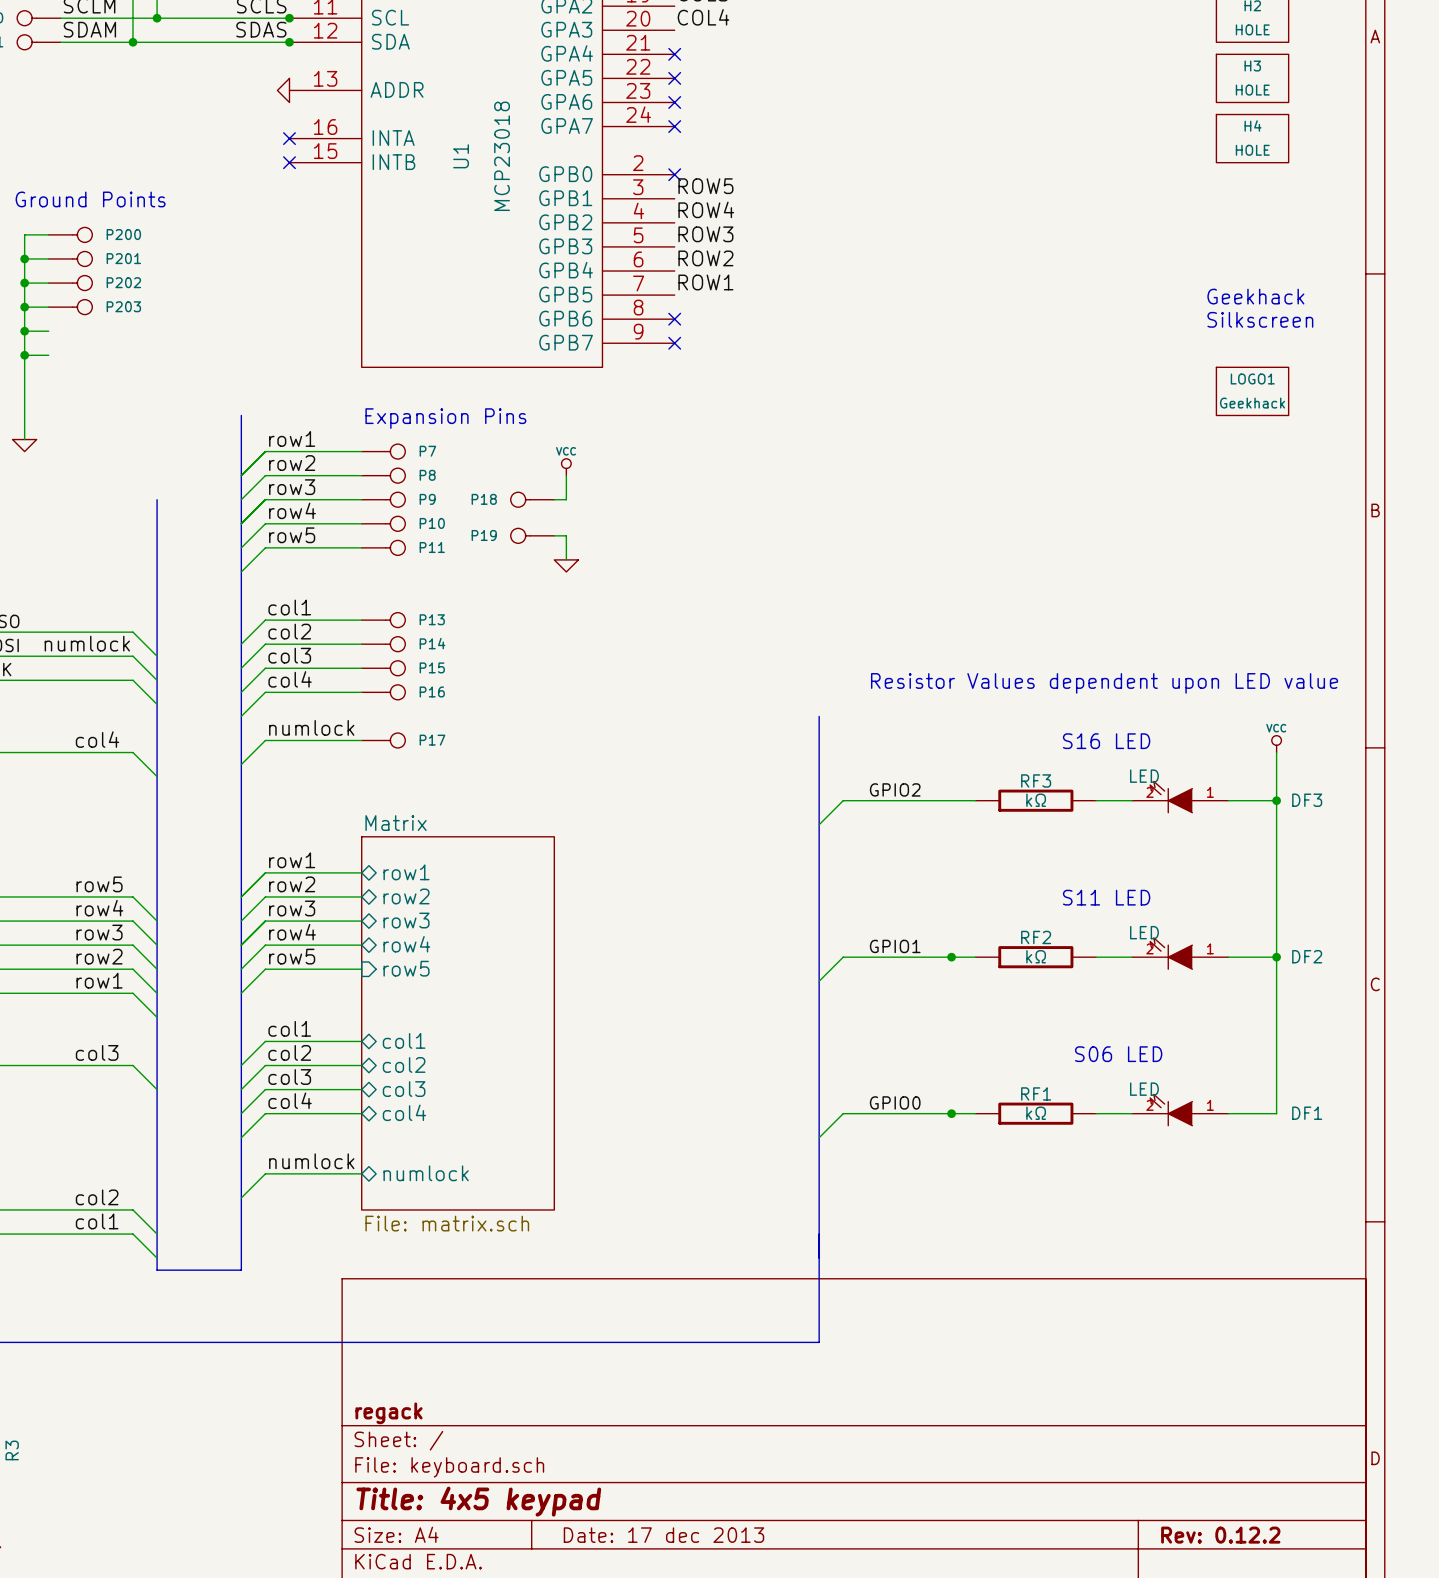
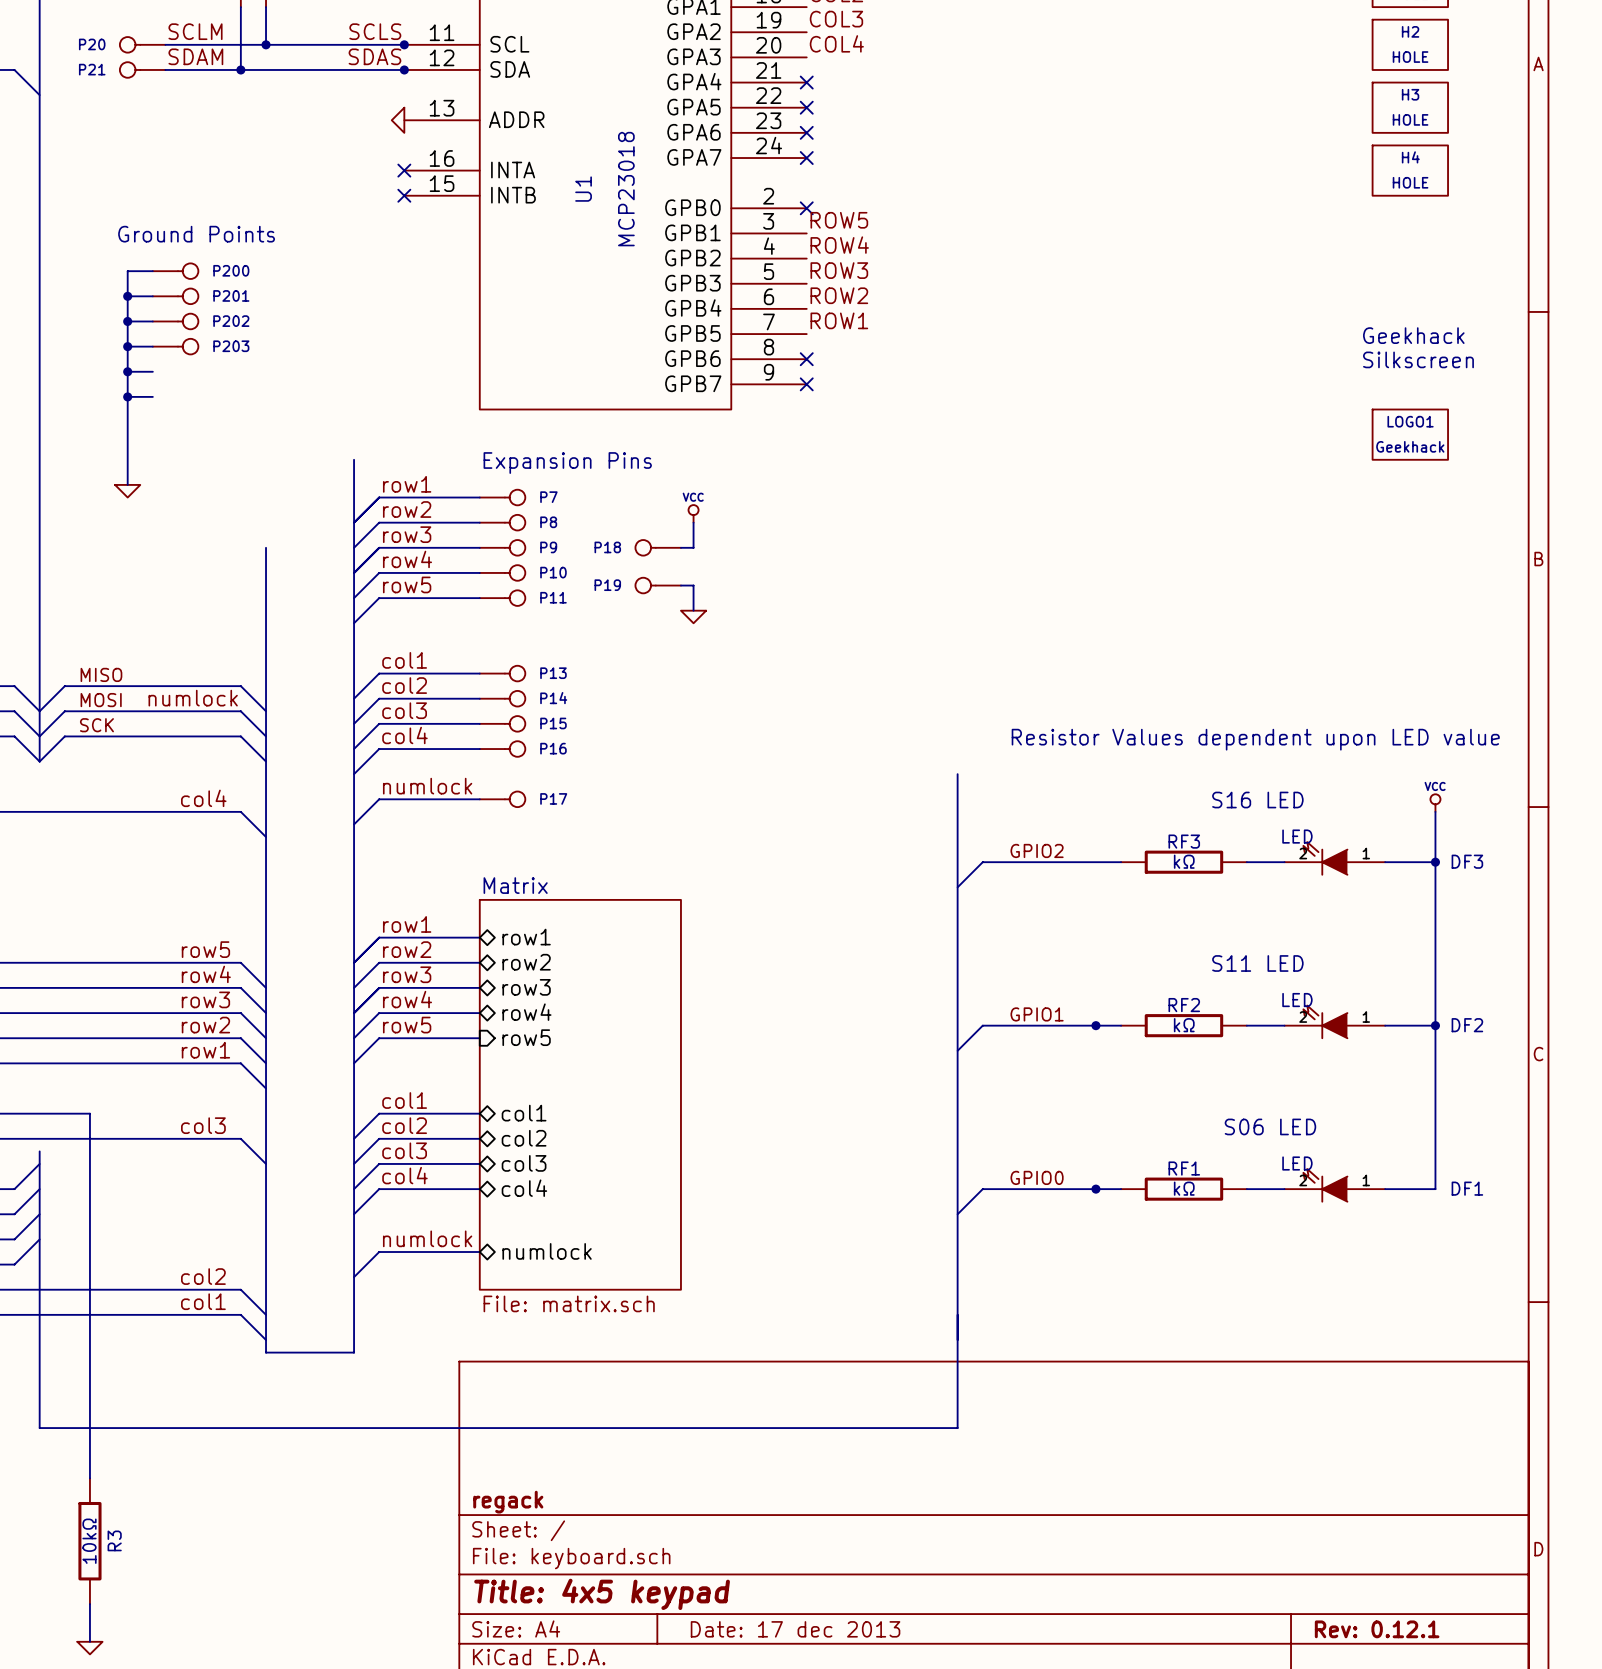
title block: Rev: 0.12.2 (1220, 1535) -> Rev: 0.12.1 (1377, 1629)

